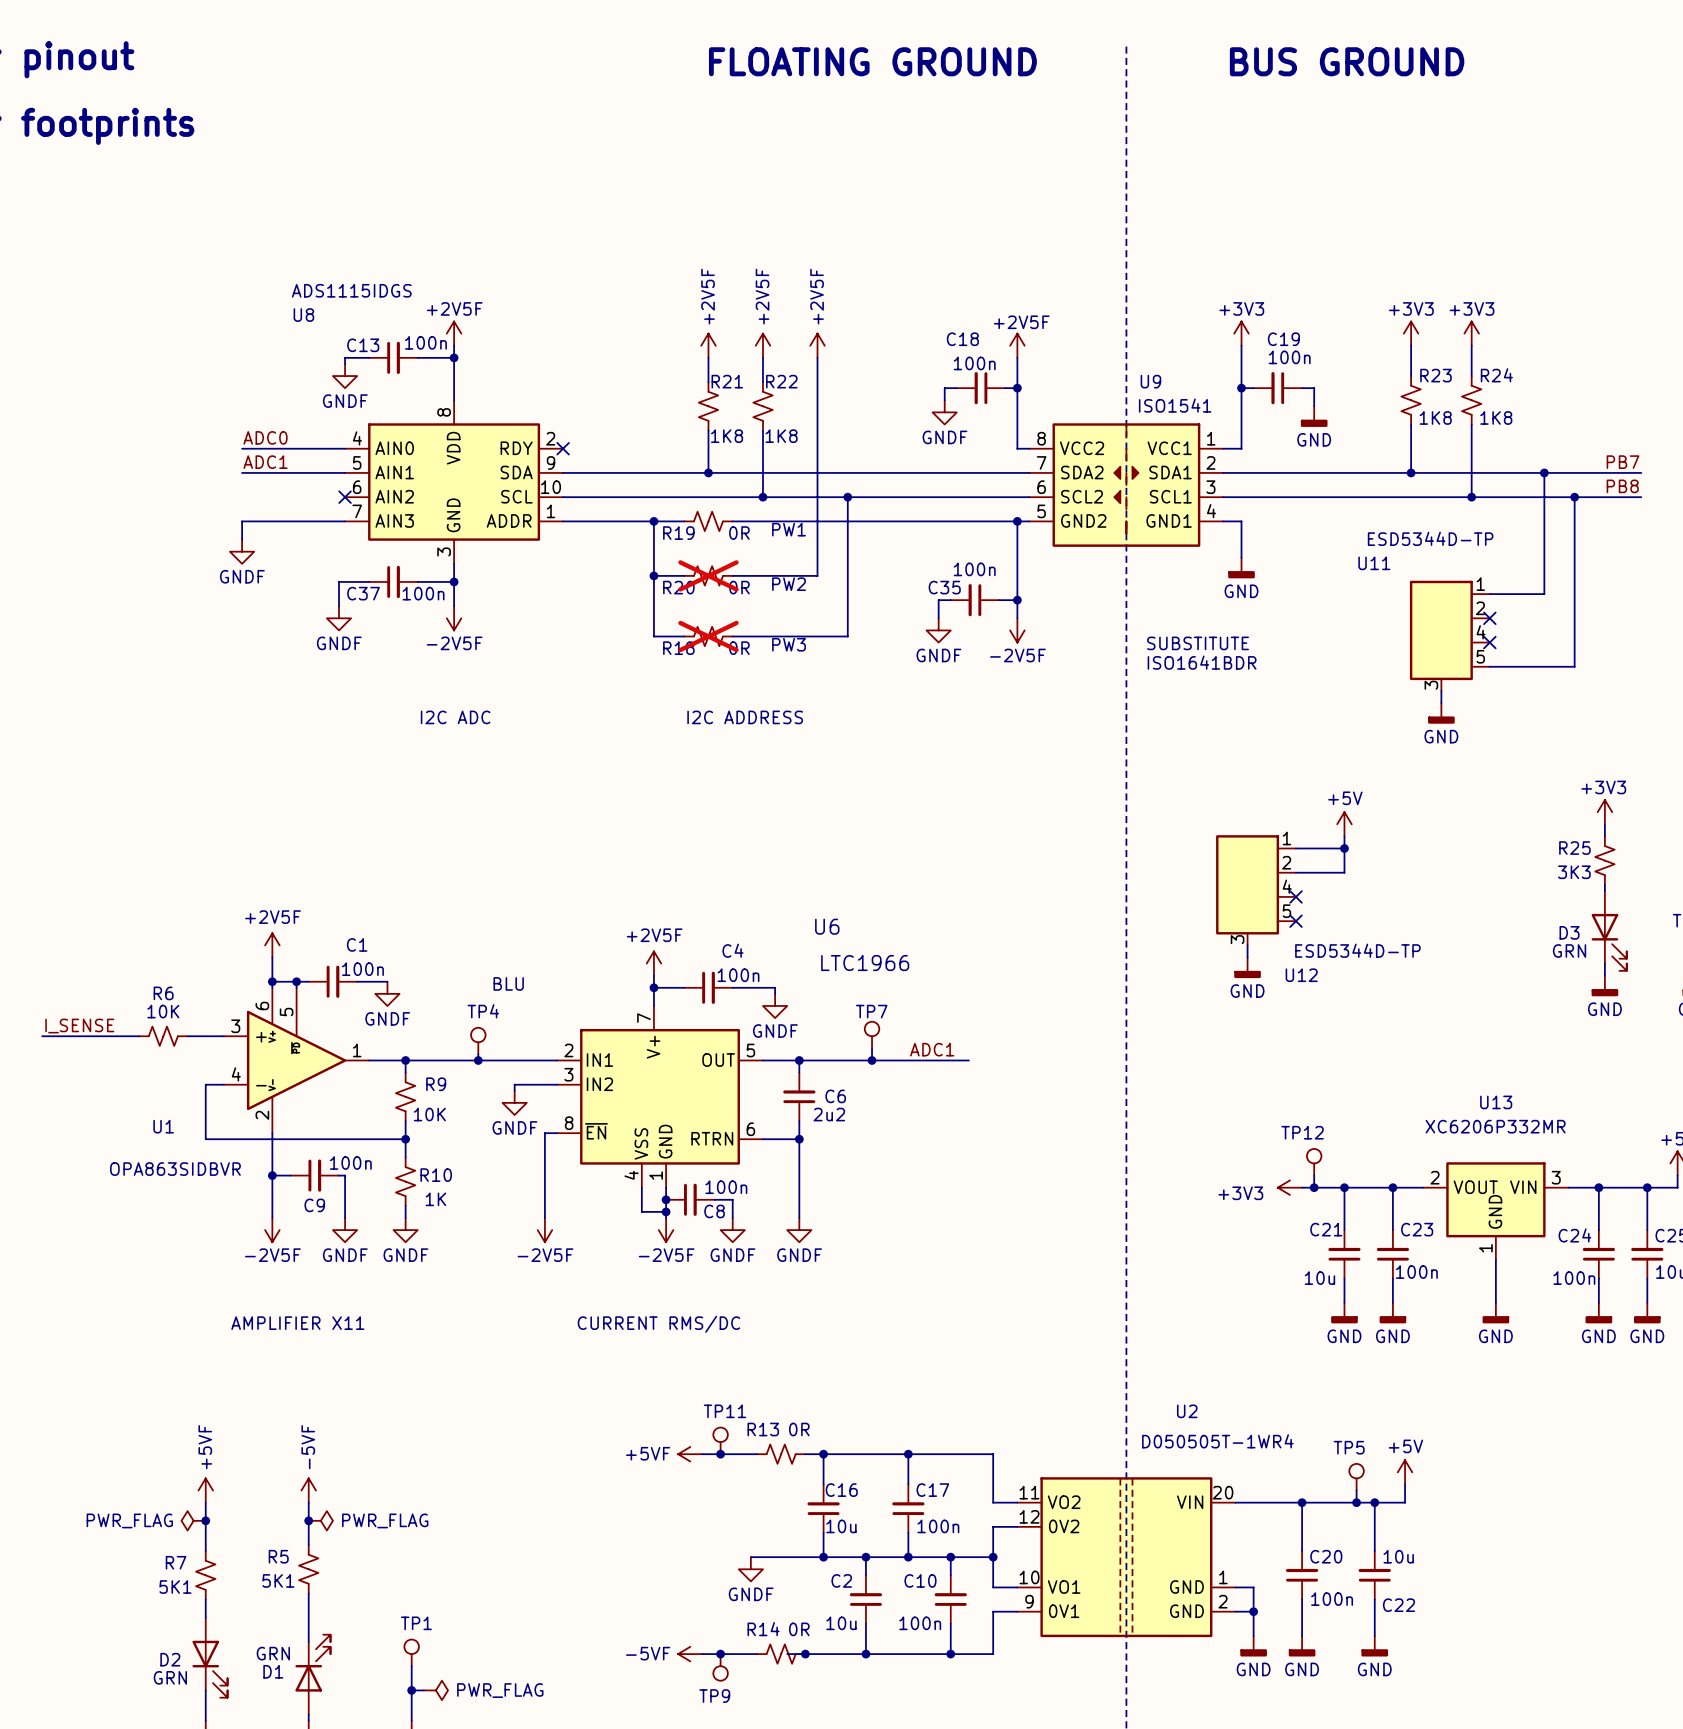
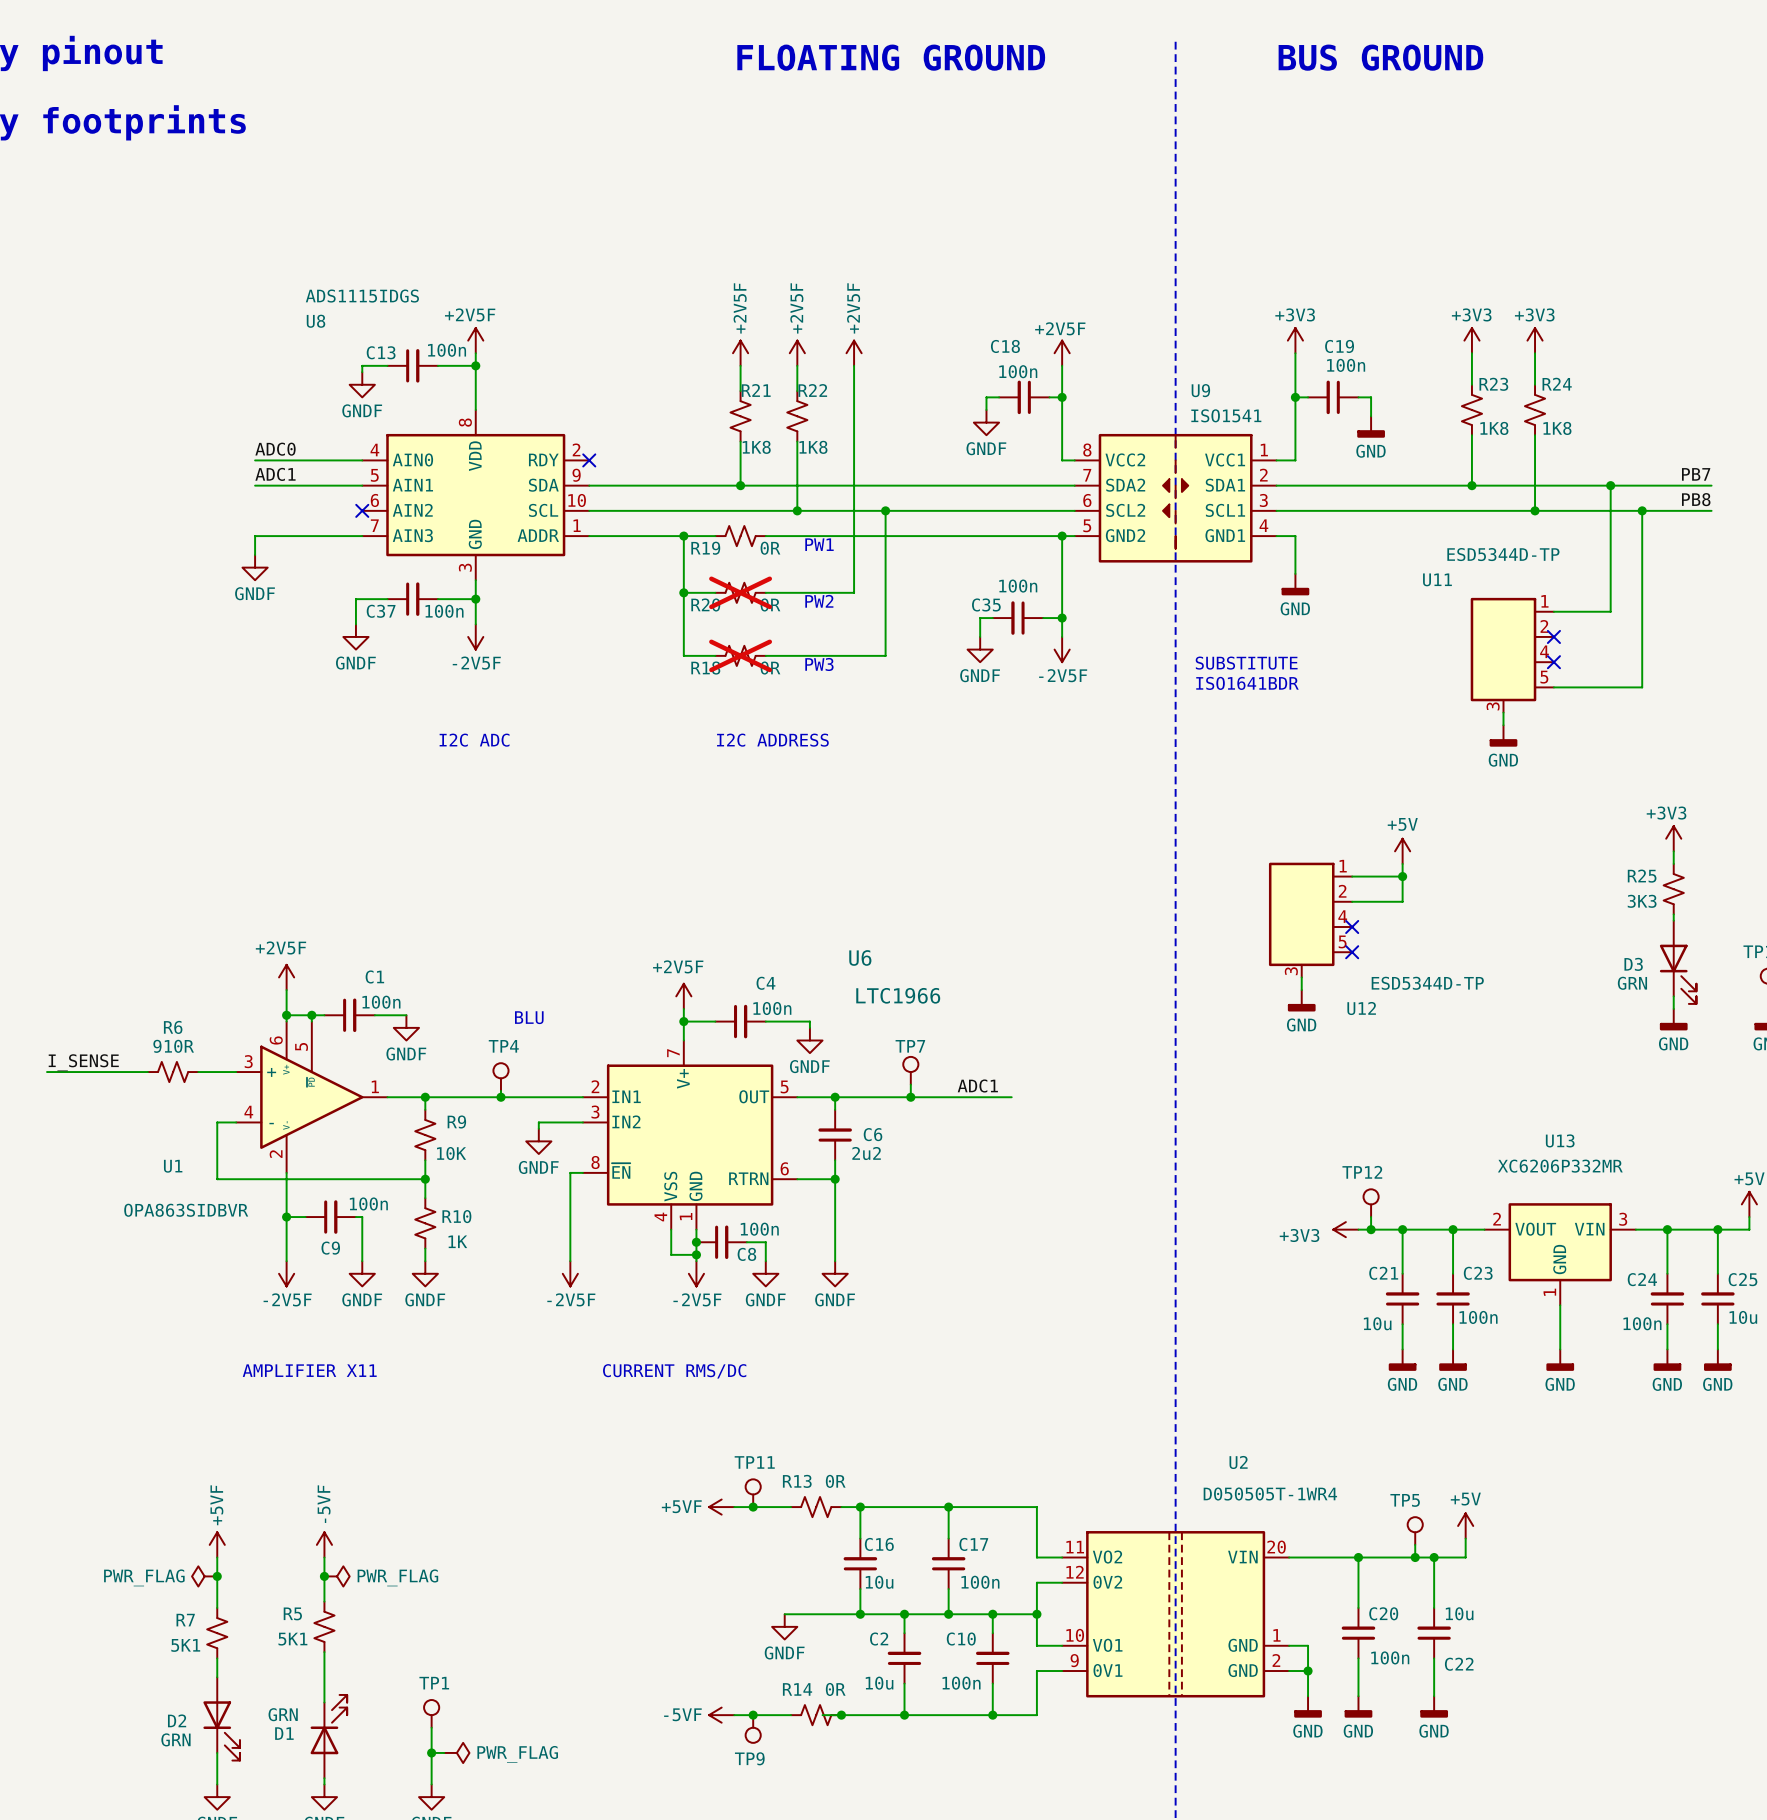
R6 value: 10K (163, 1011) -> 910R (173, 1046)

